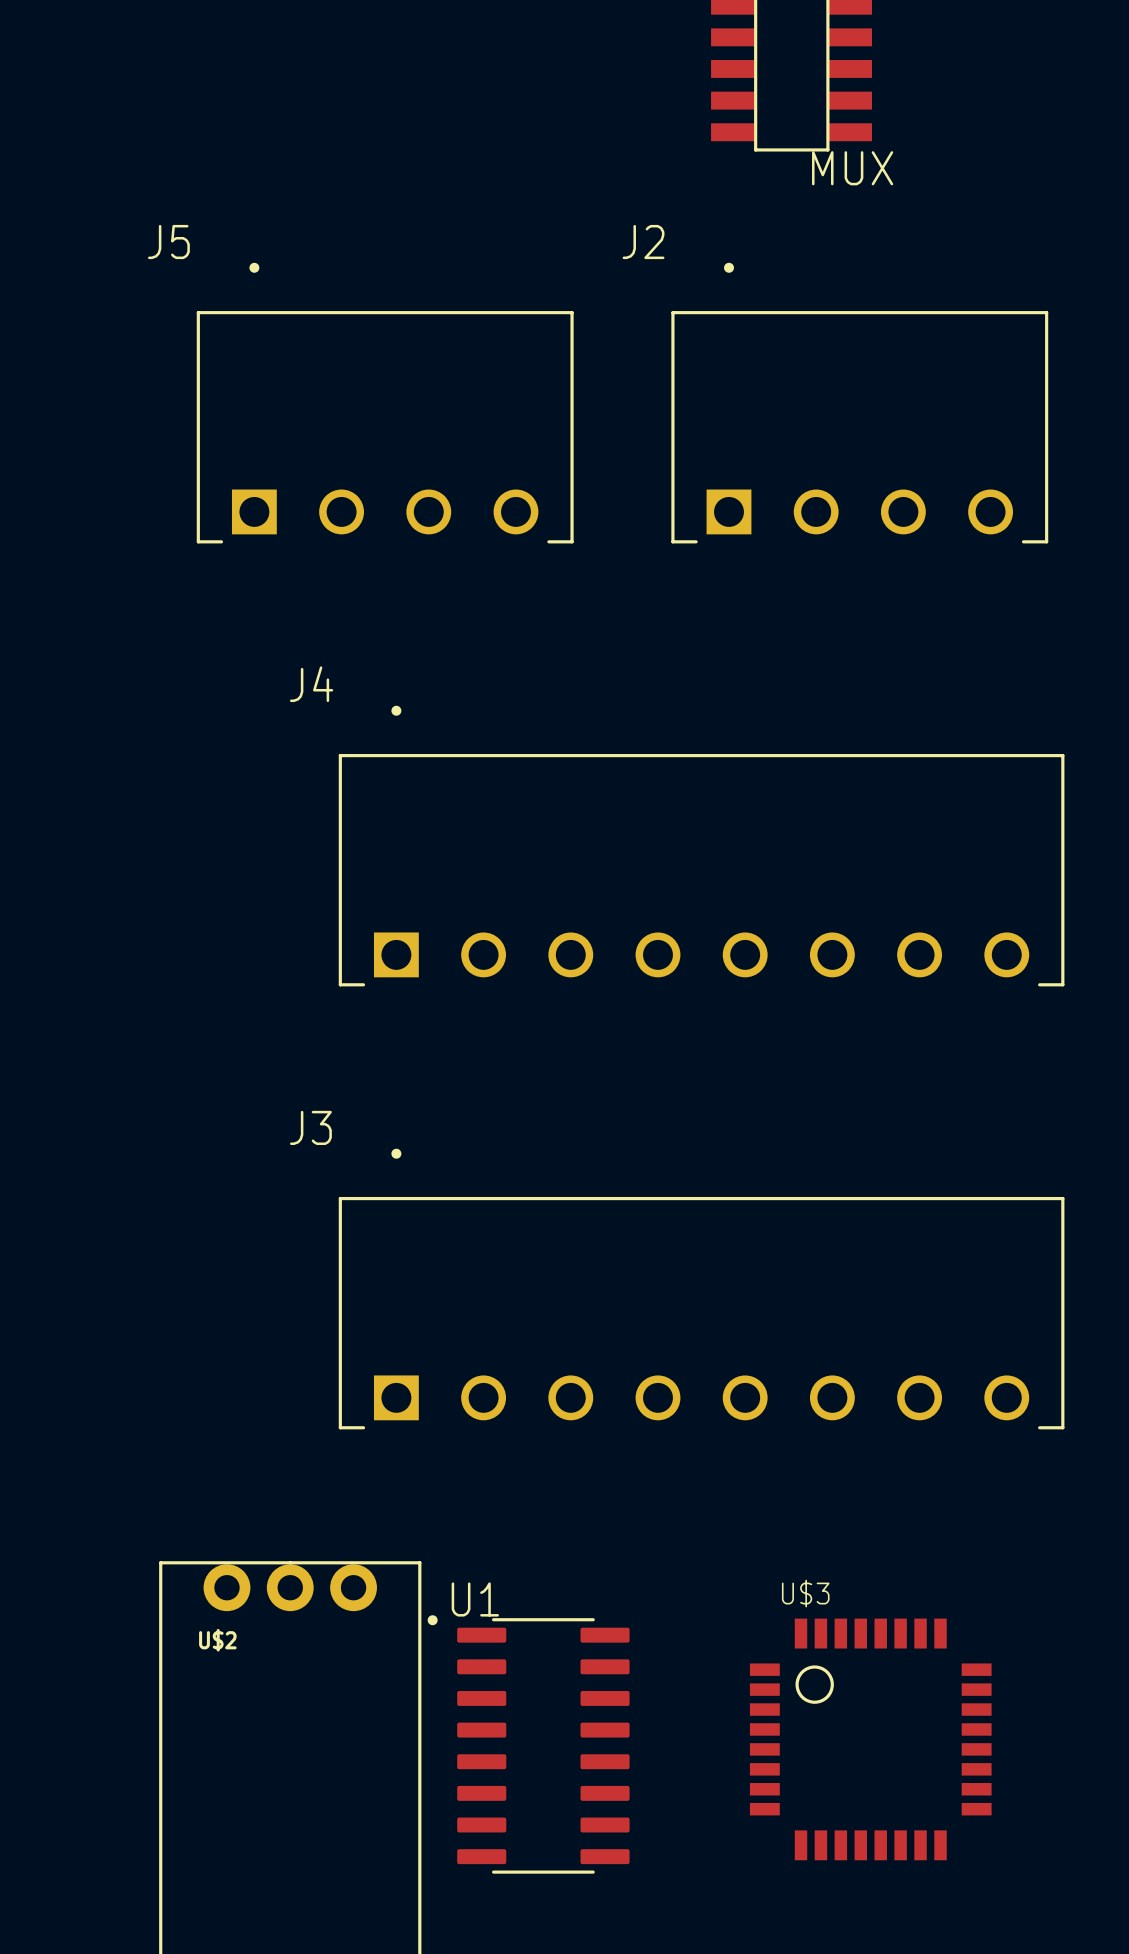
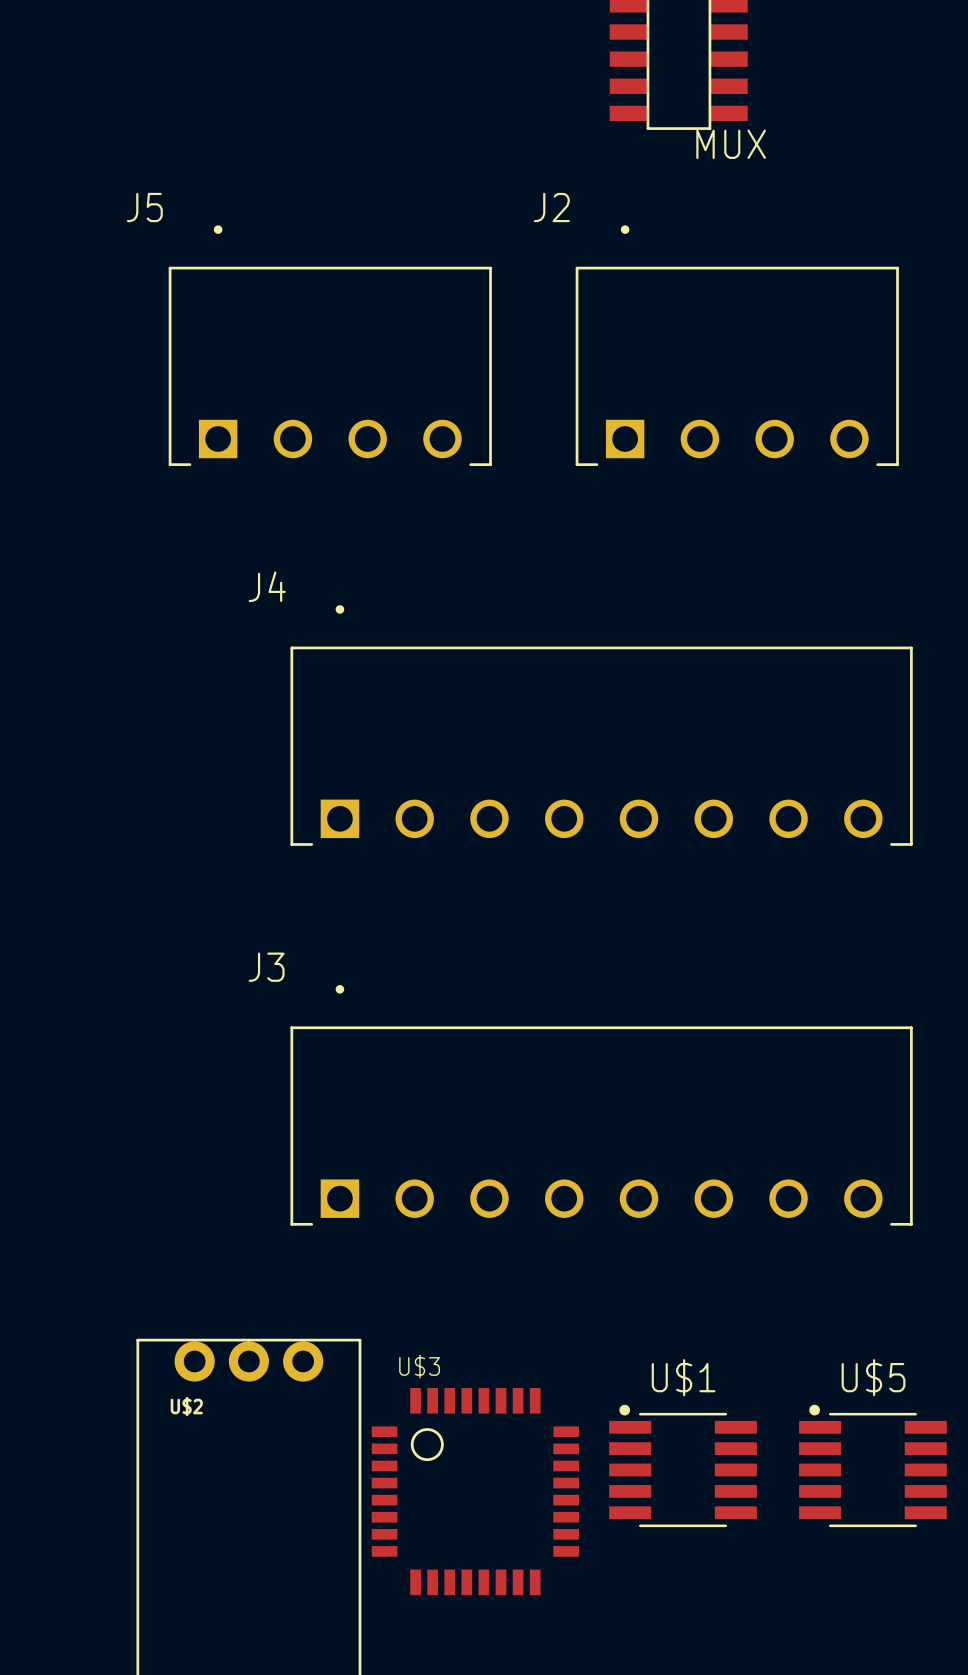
U$1: none -> (683, 1465)
U$5: none -> (872, 1465)
U$3 position: (870, 1739) -> (475, 1491)
U1: (528, 1744) -> none

